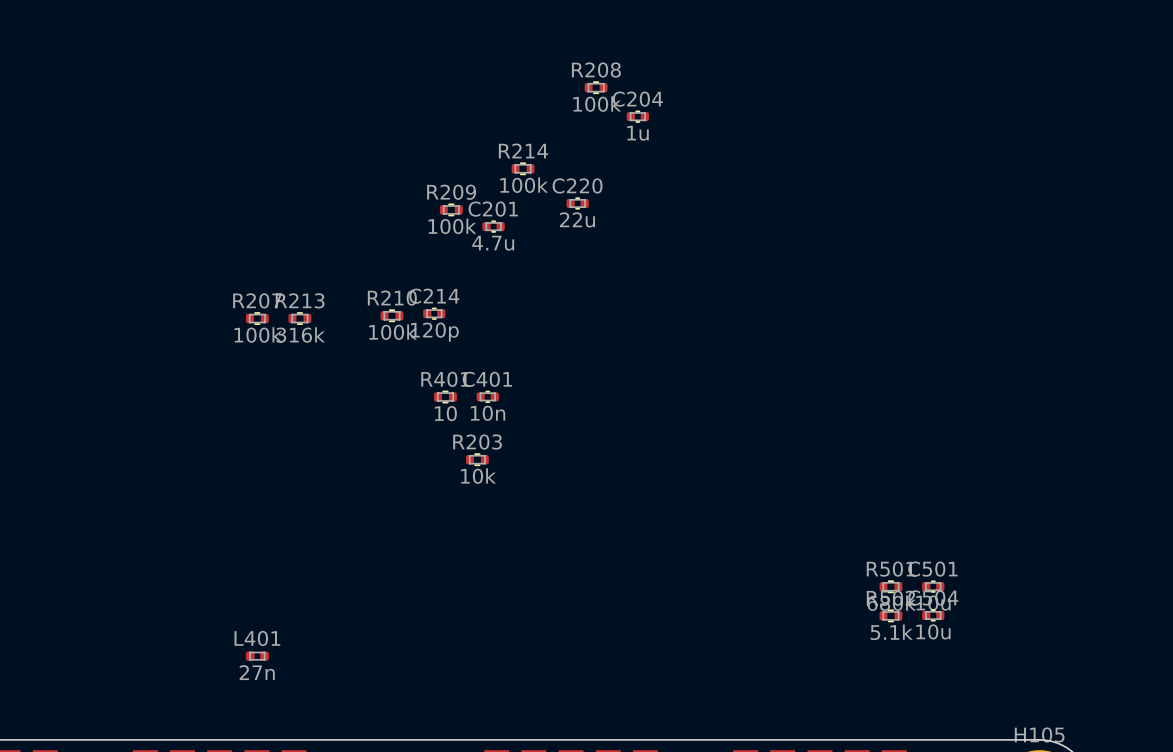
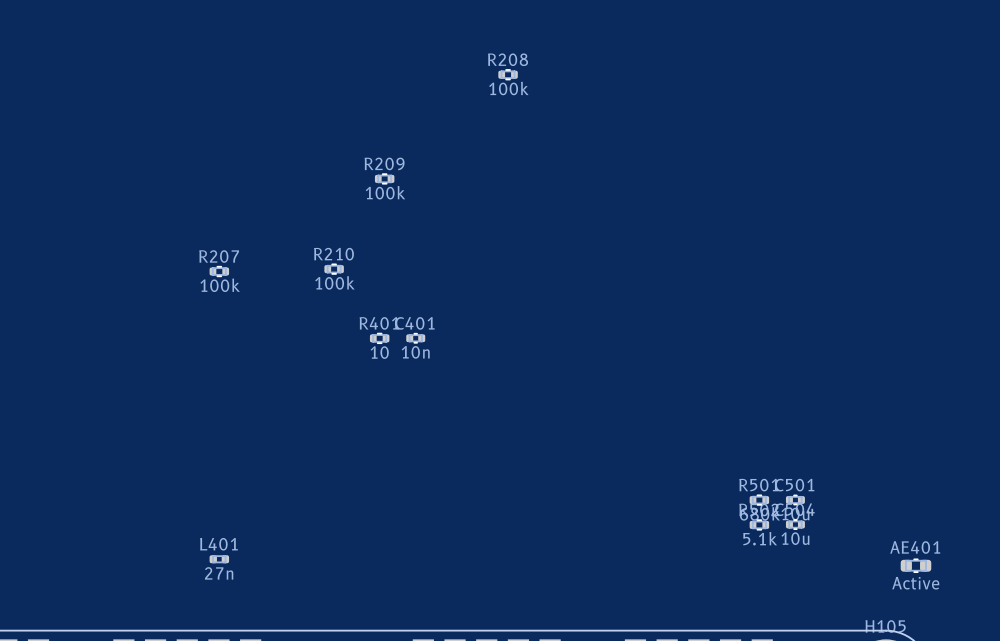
C204: 1u (637, 116) -> none
R214: 100k (523, 168) -> none
C220: 22u (577, 203) -> none
C201: 4.7u (493, 226) -> none
C214: 120p (434, 313) -> none
R213: 316k (299, 318) -> none
R203: 10k (477, 459) -> none
AE401: none -> Active (915, 565)

